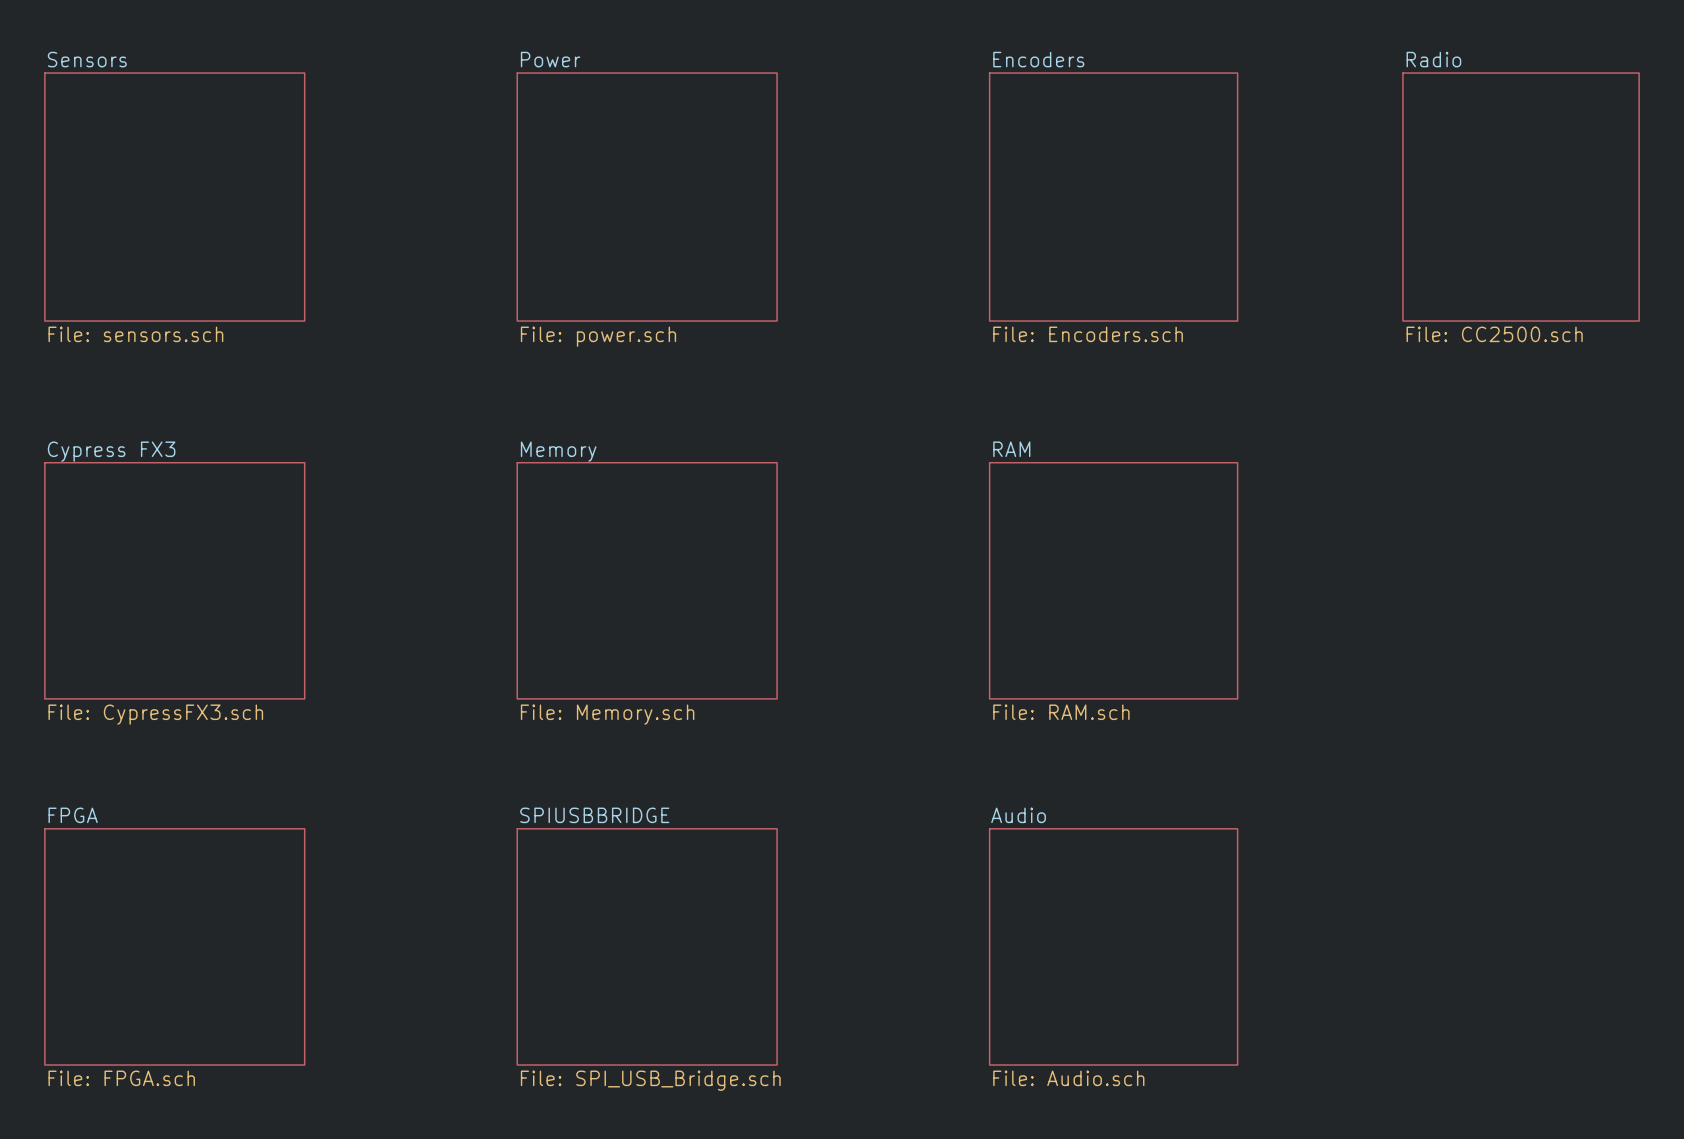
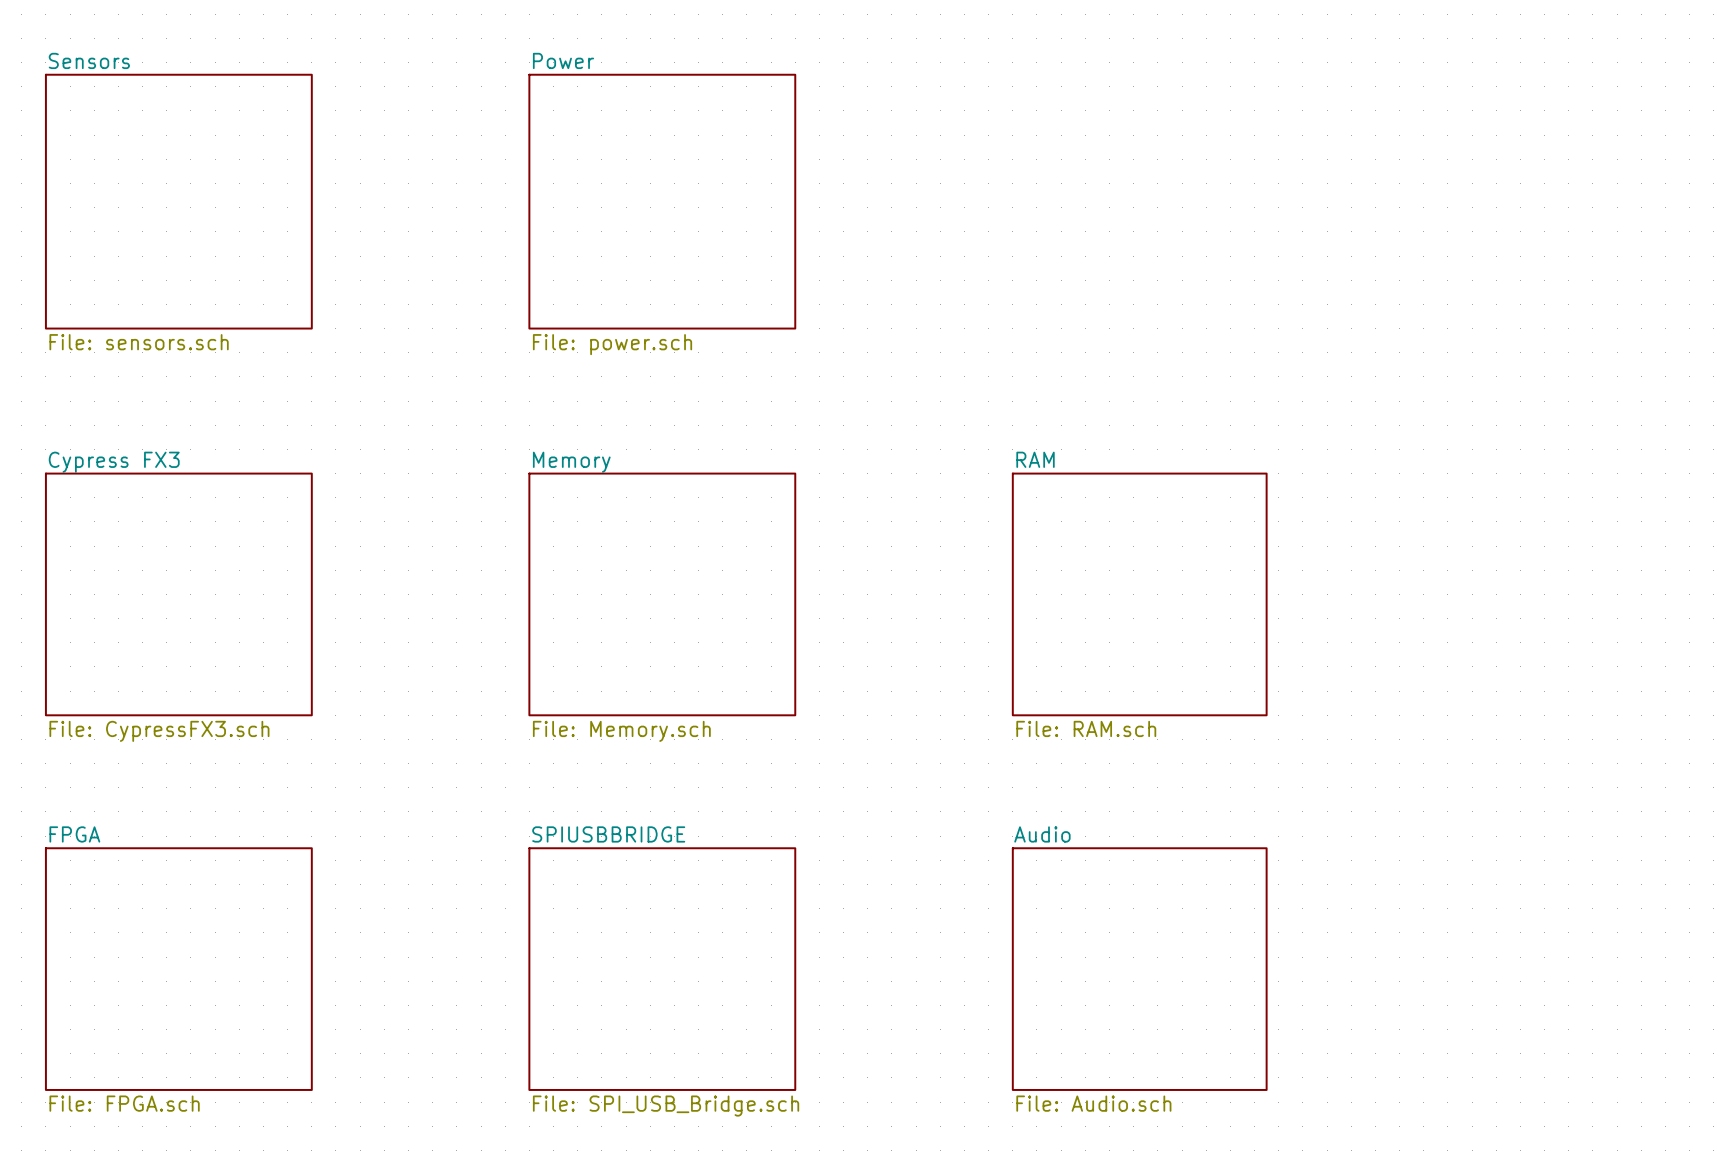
sheet Encoders: File: Encoders.sch (1113, 197) -> none
sheet Radio: File: CC2500.sch (1521, 197) -> none

